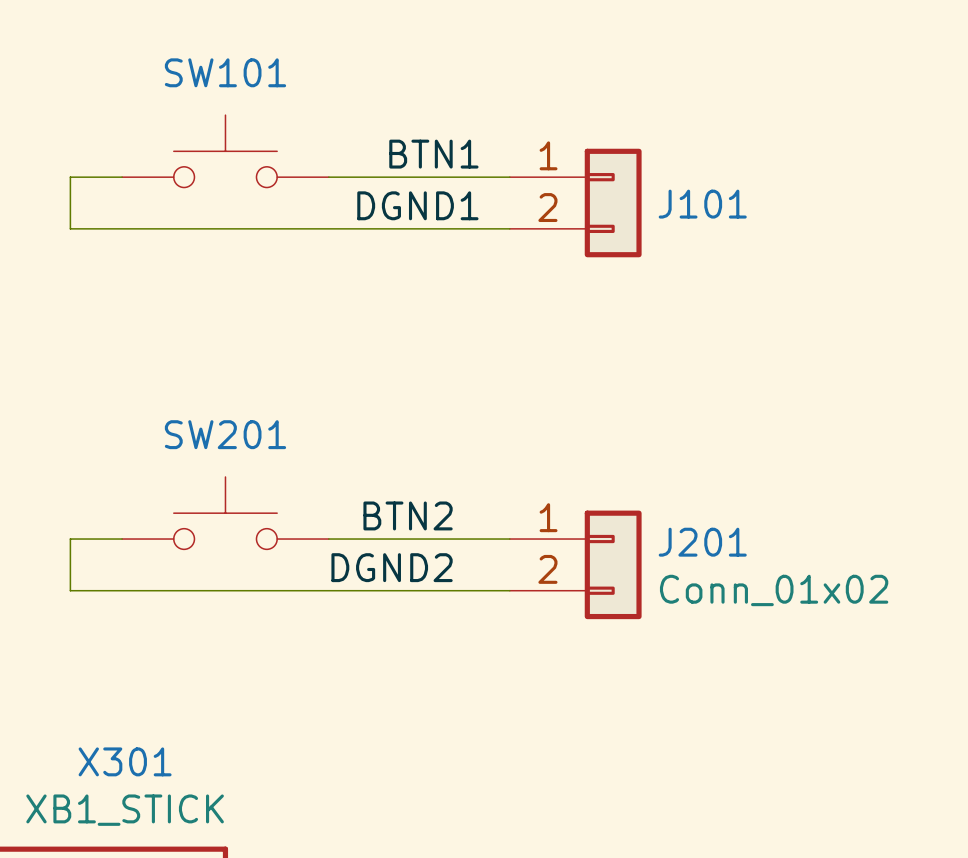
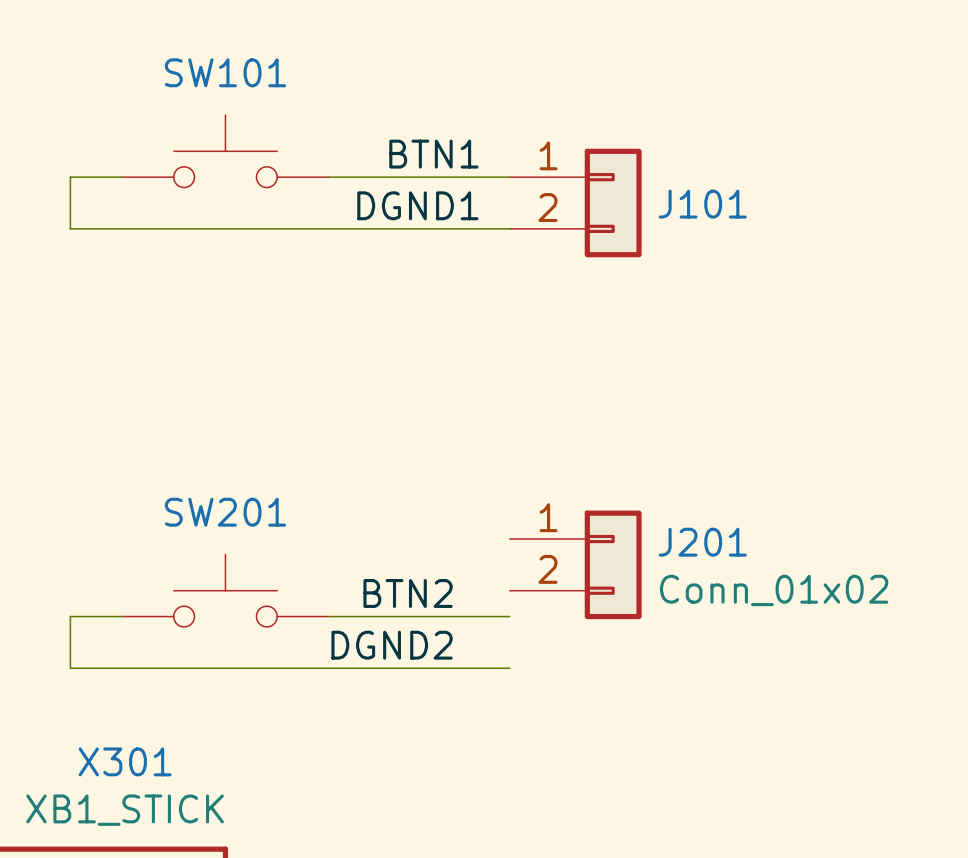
SW201 position: (225, 513) -> (225, 590)
label position: BTN2 (408, 515) -> BTN2 (408, 593)
wire: (122, 539) (70, 539) (70, 590) (509, 590) -> (122, 616) (70, 616) (70, 668) (509, 668)
wire: (328, 539) (509, 539) -> (328, 616) (509, 616)
label position: DGND2 (392, 567) -> DGND2 (392, 645)

